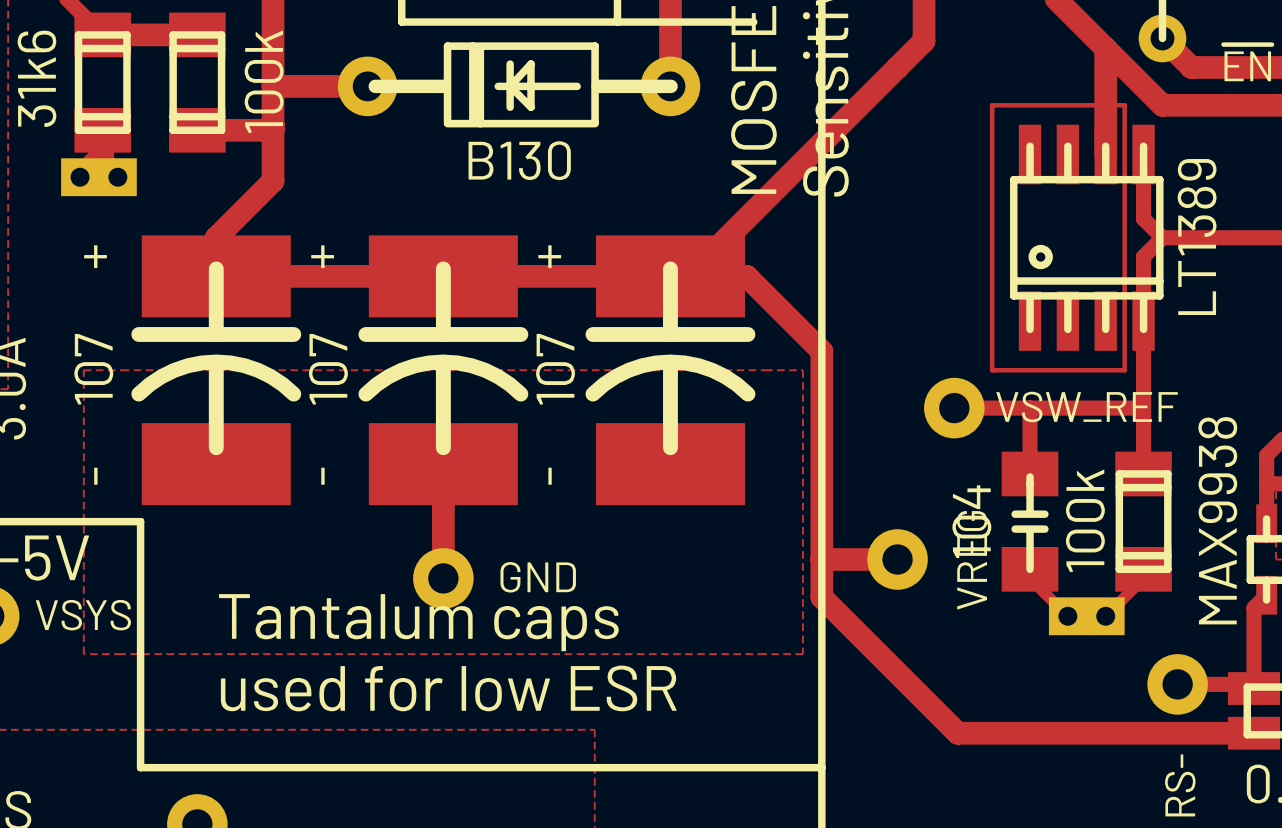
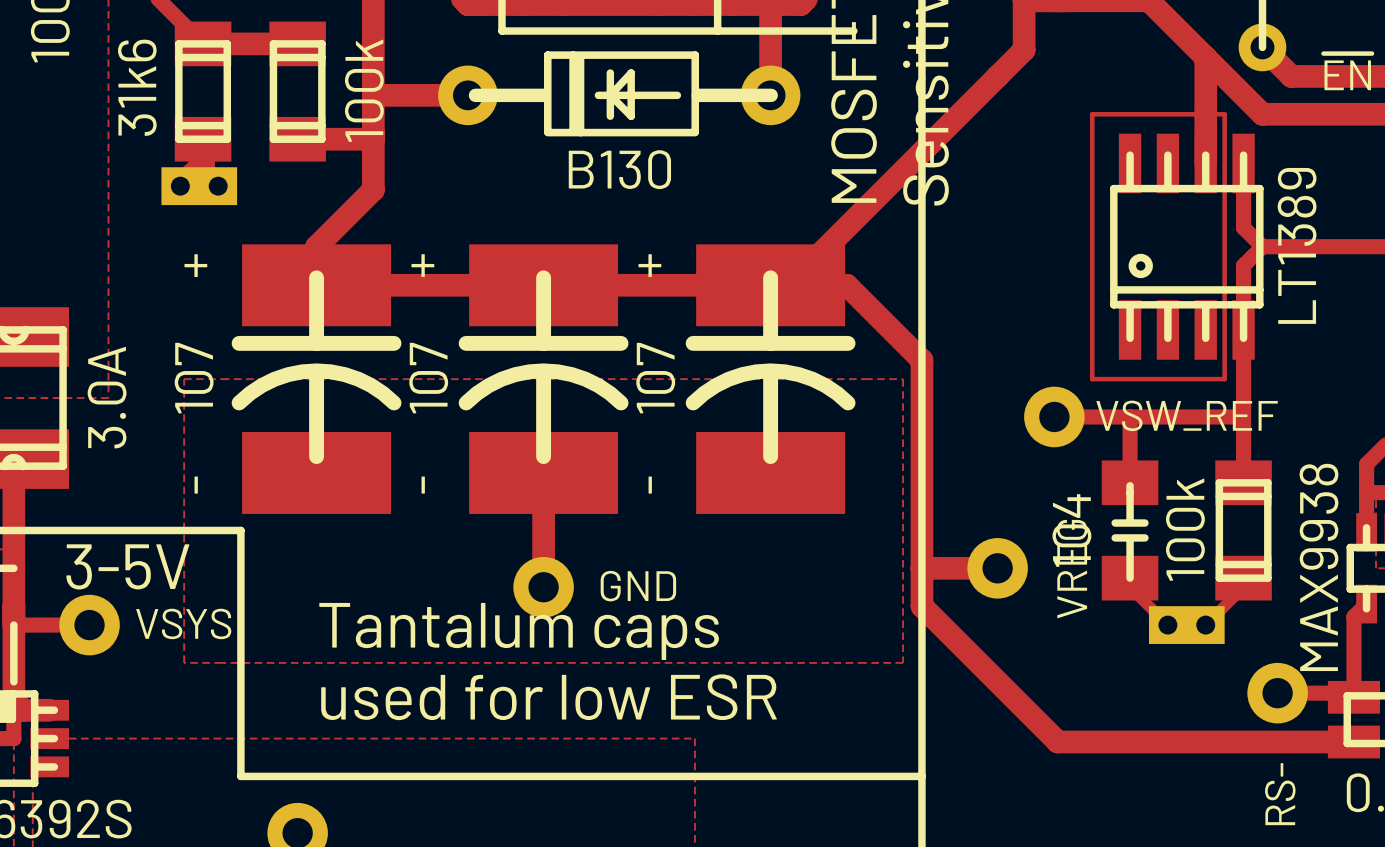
part value position: MAX9938 (1217, 520) -> MAX9938 (1318, 567)

